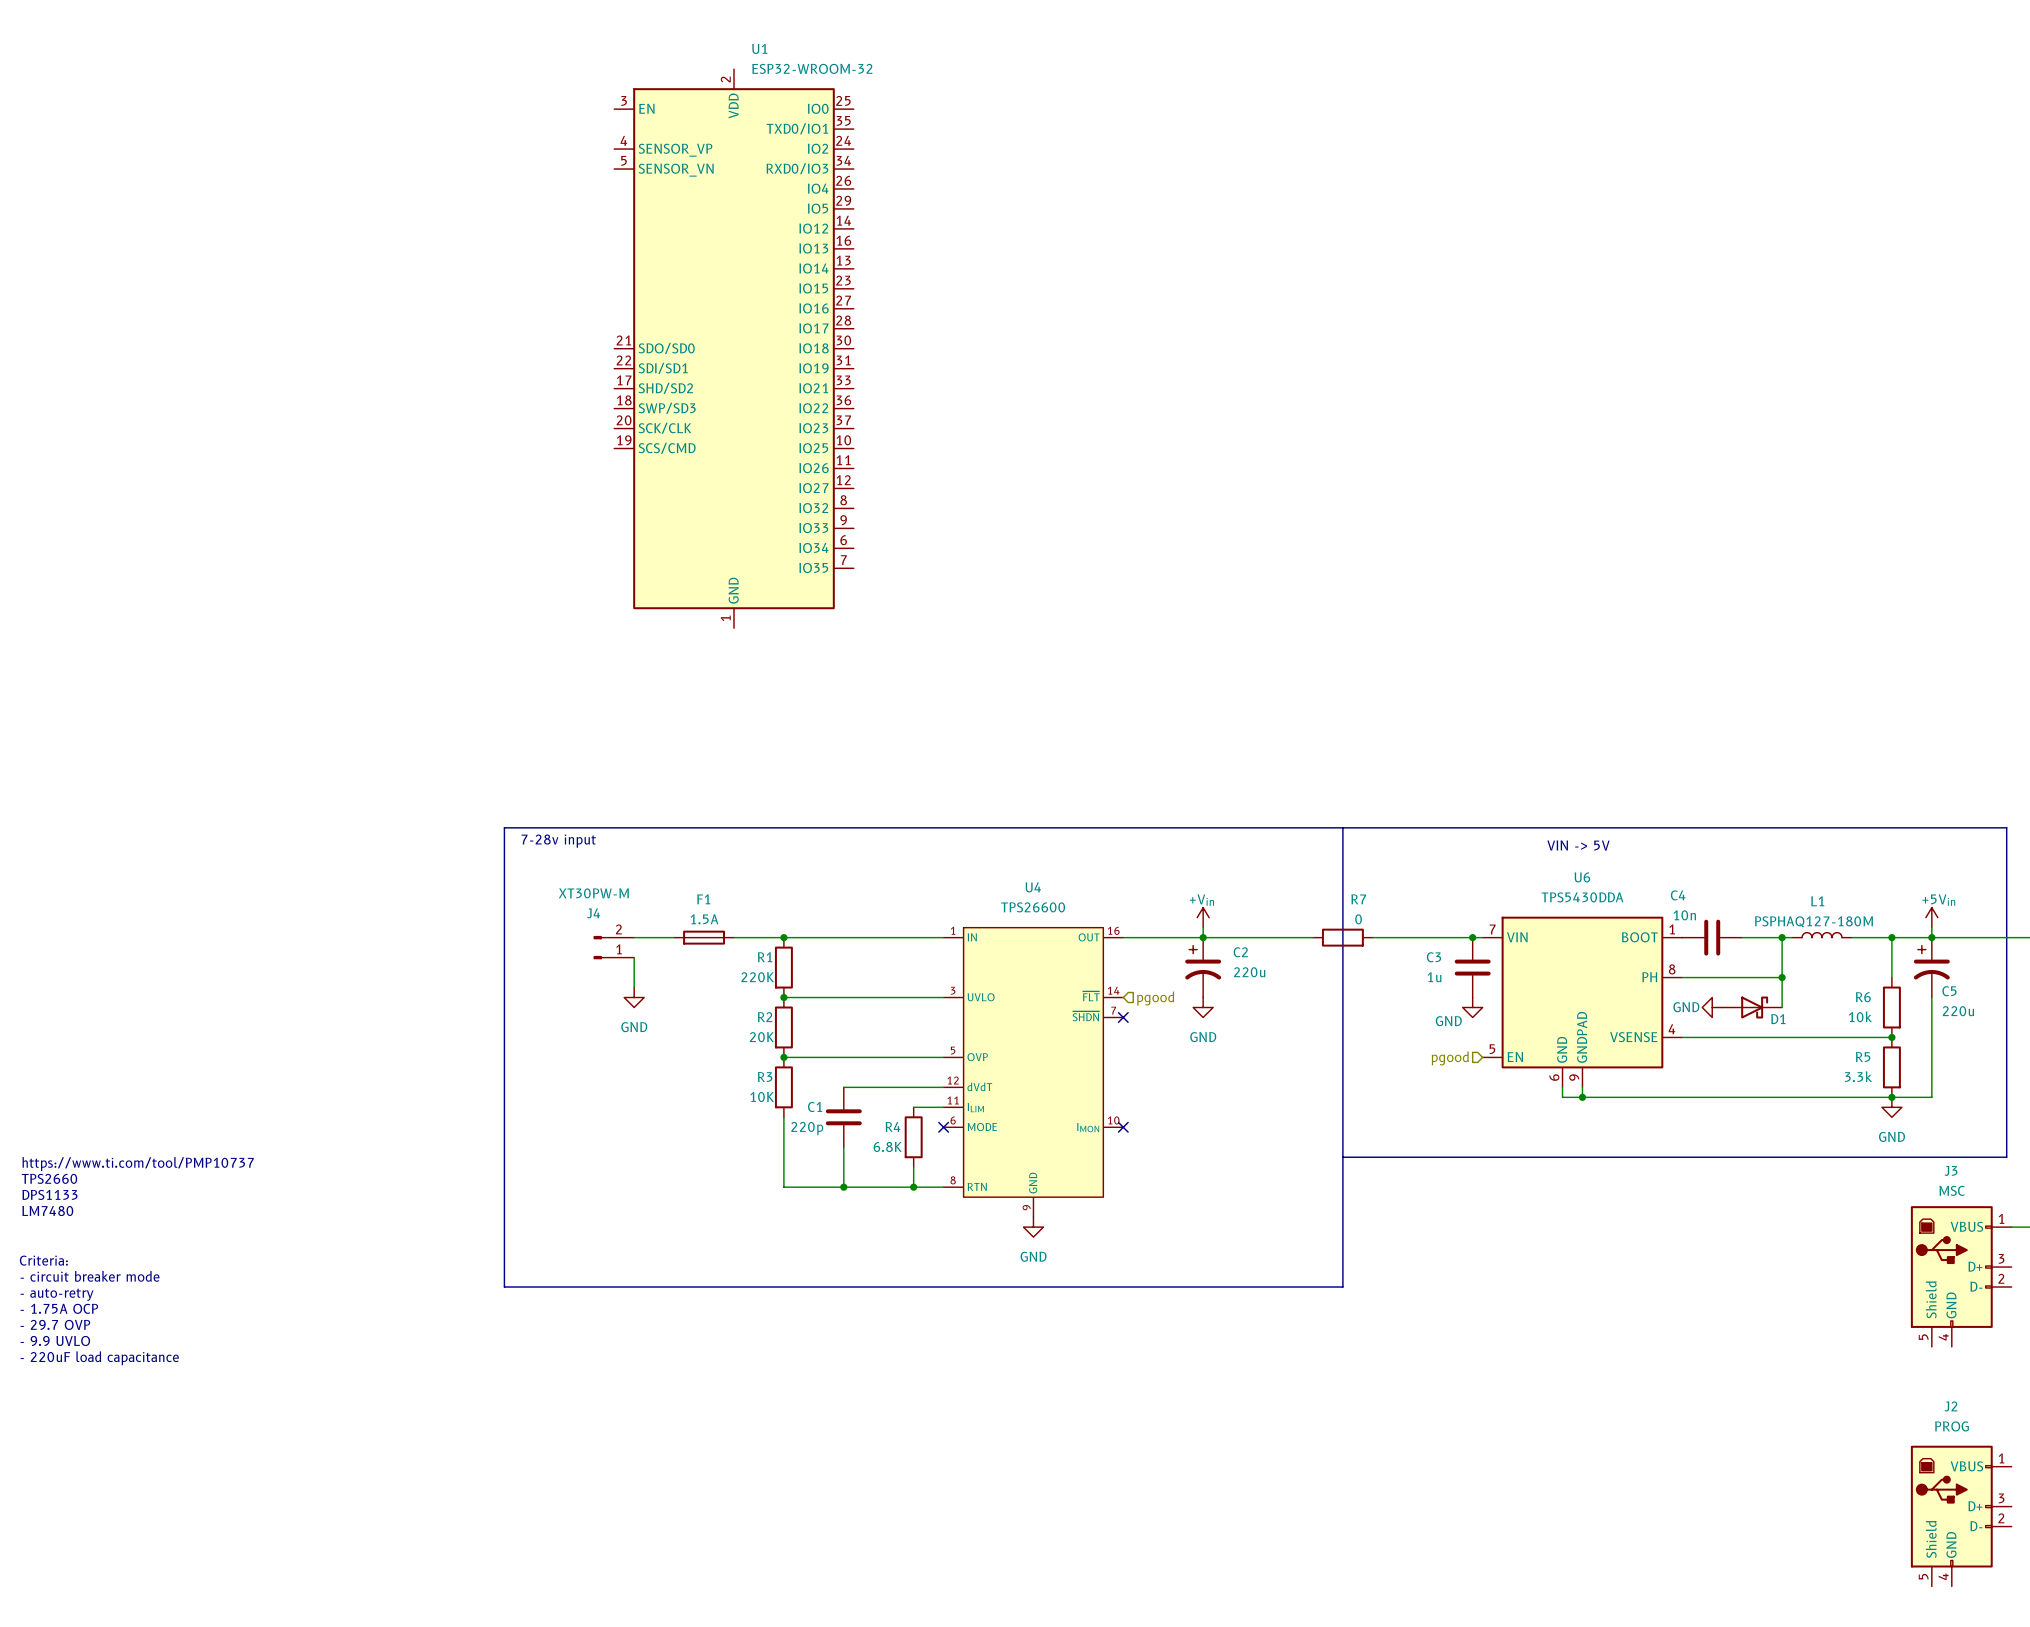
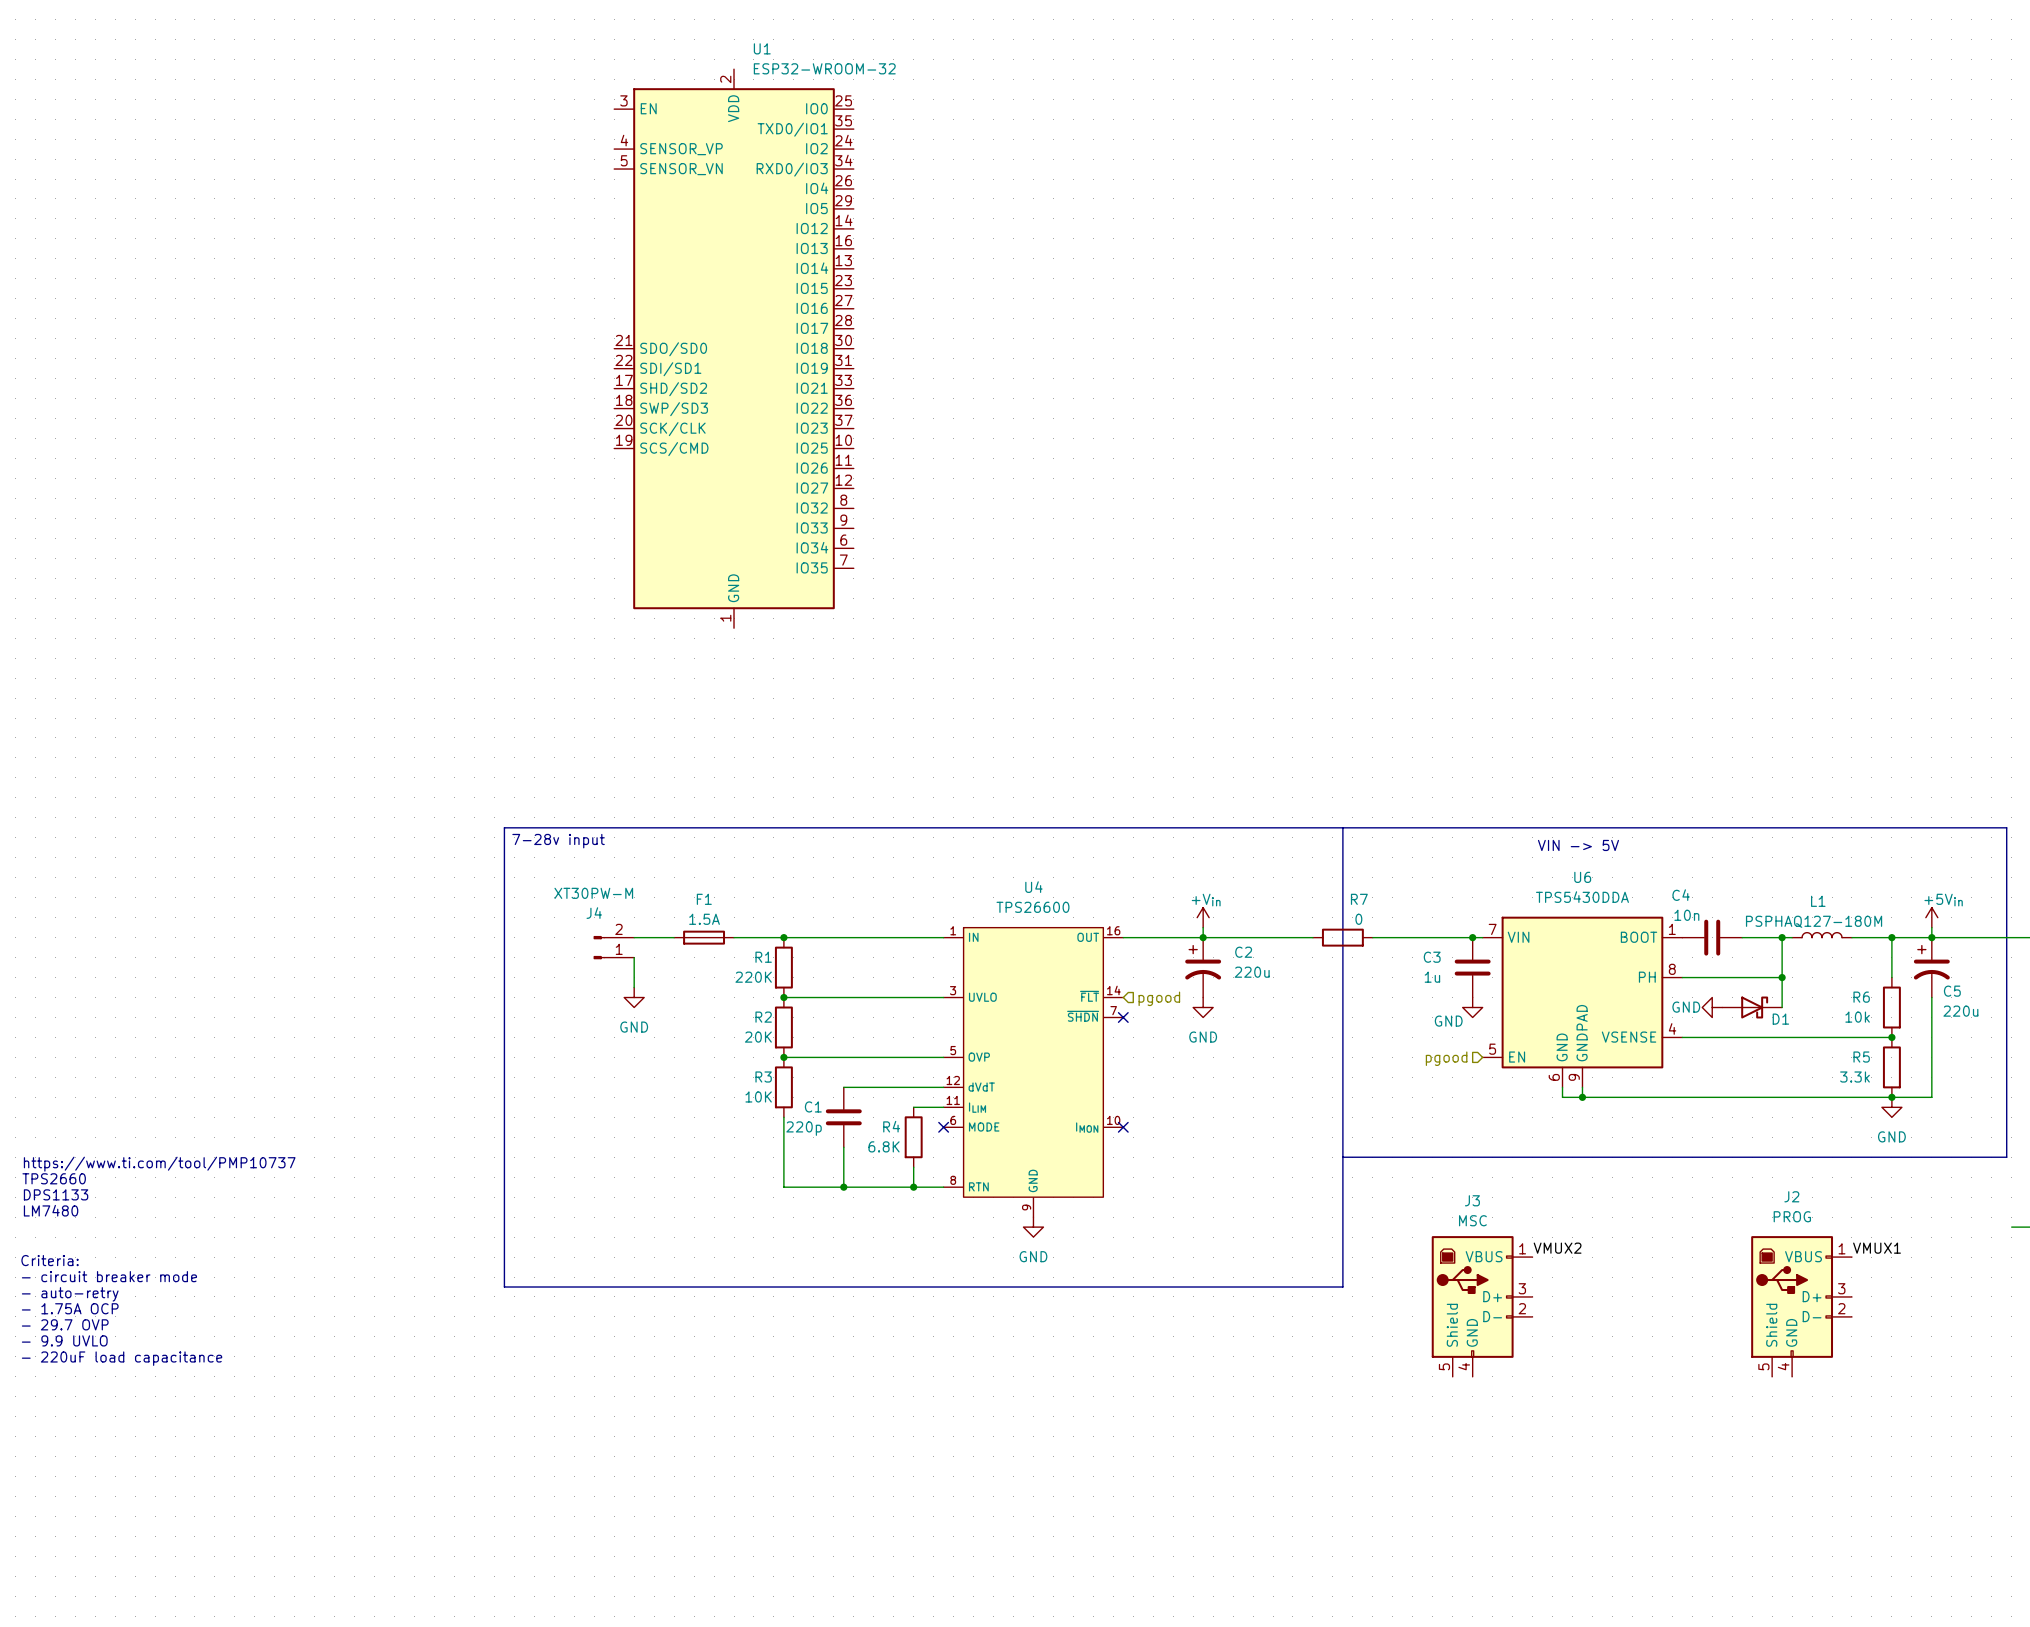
label: none -> VMUX2 (1557, 1248)
label: none -> VMUX1 (1877, 1248)
J3 position: (1961, 1276) -> (1482, 1306)
J2 position: (1961, 1516) -> (1801, 1306)

